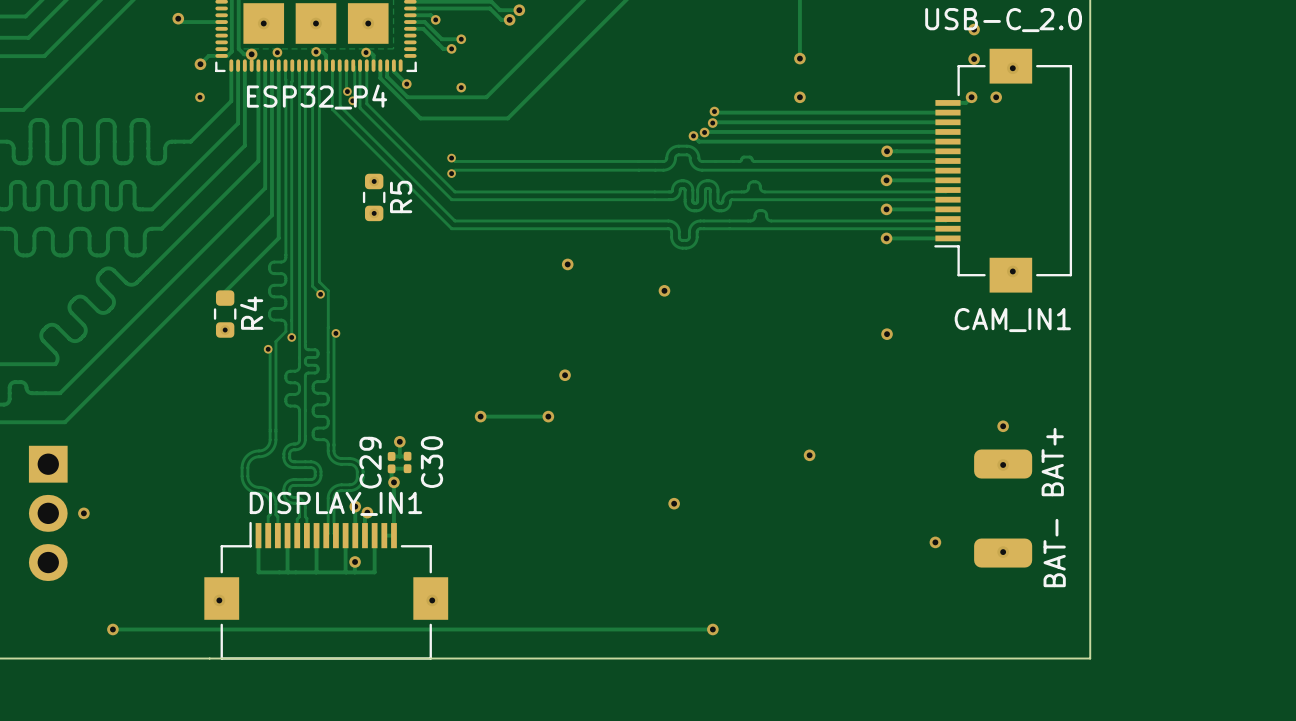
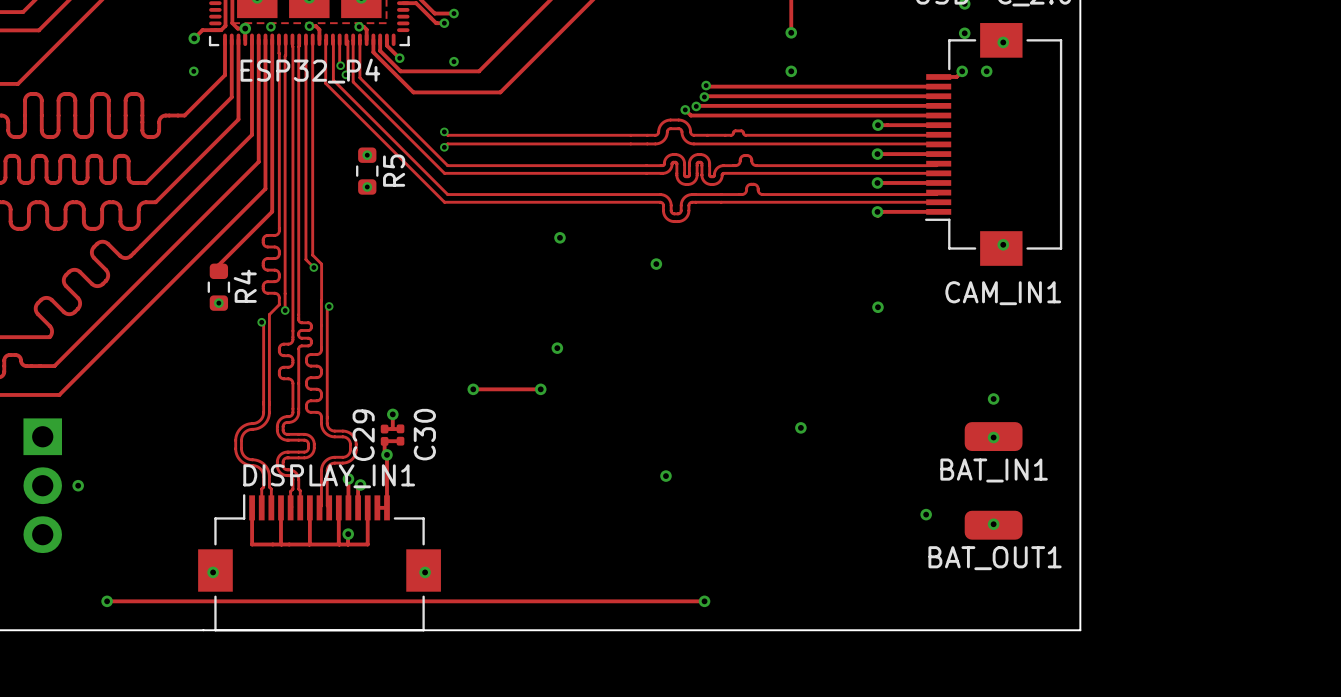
BAT+ name: BAT+ (1052, 462) -> BAT_IN1 (994, 470)
BAT- name: BAT- (1054, 553) -> BAT_OUT1 (995, 558)

